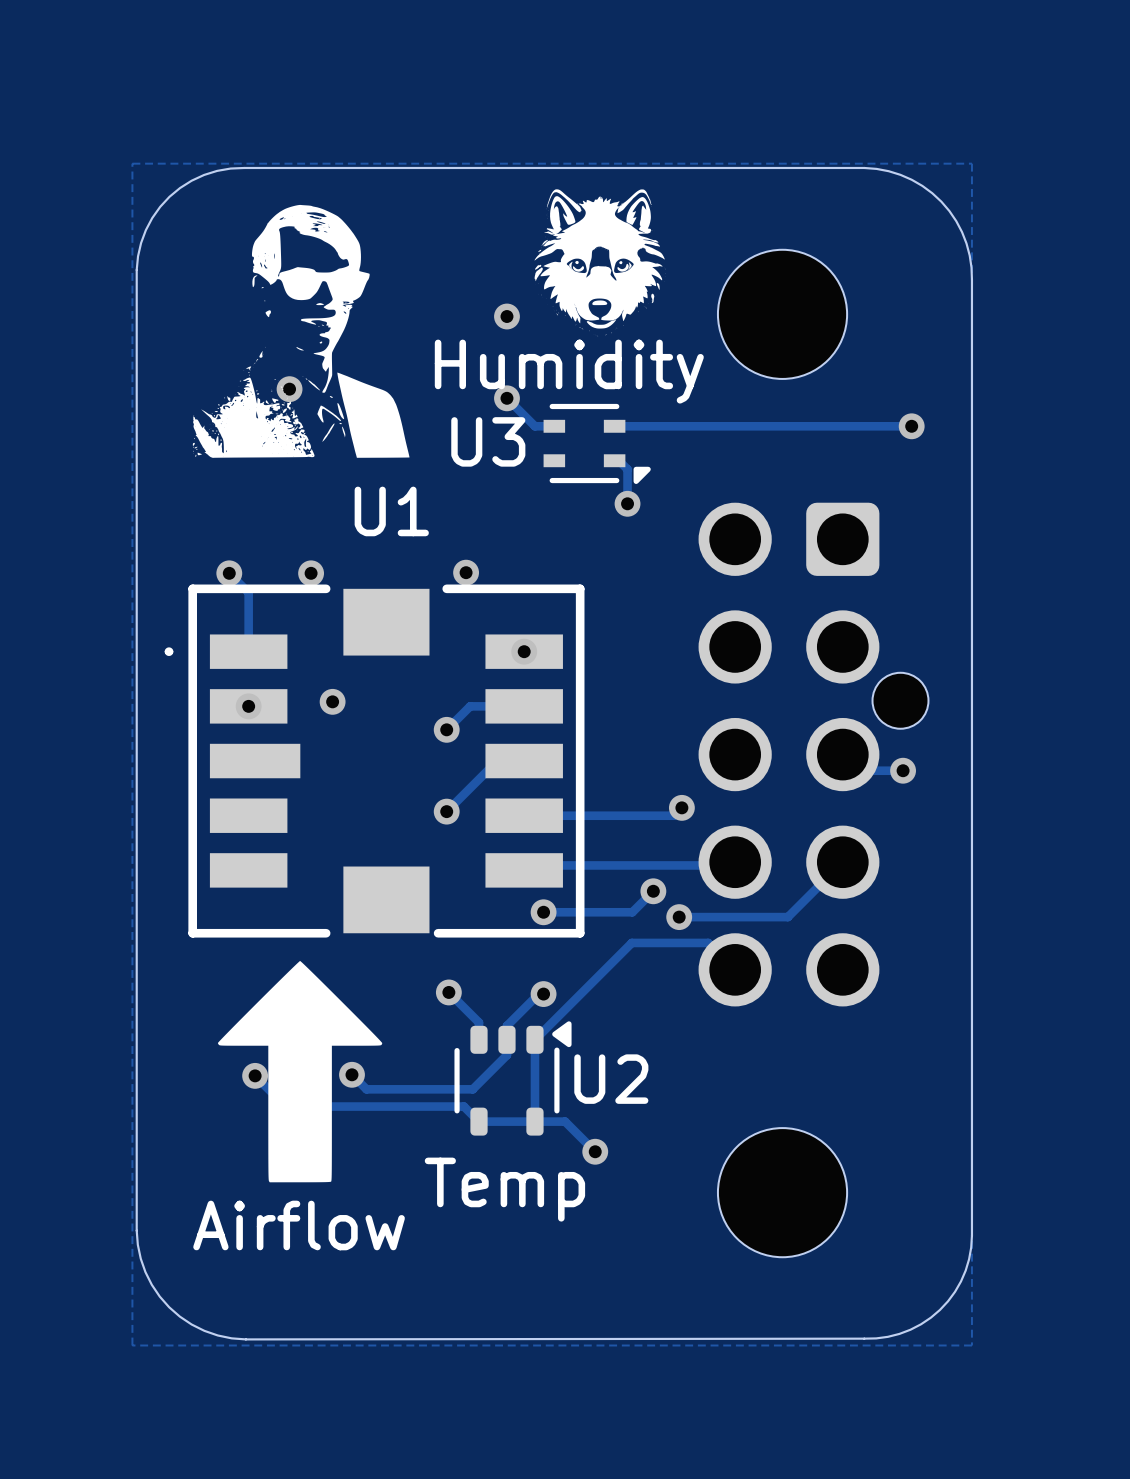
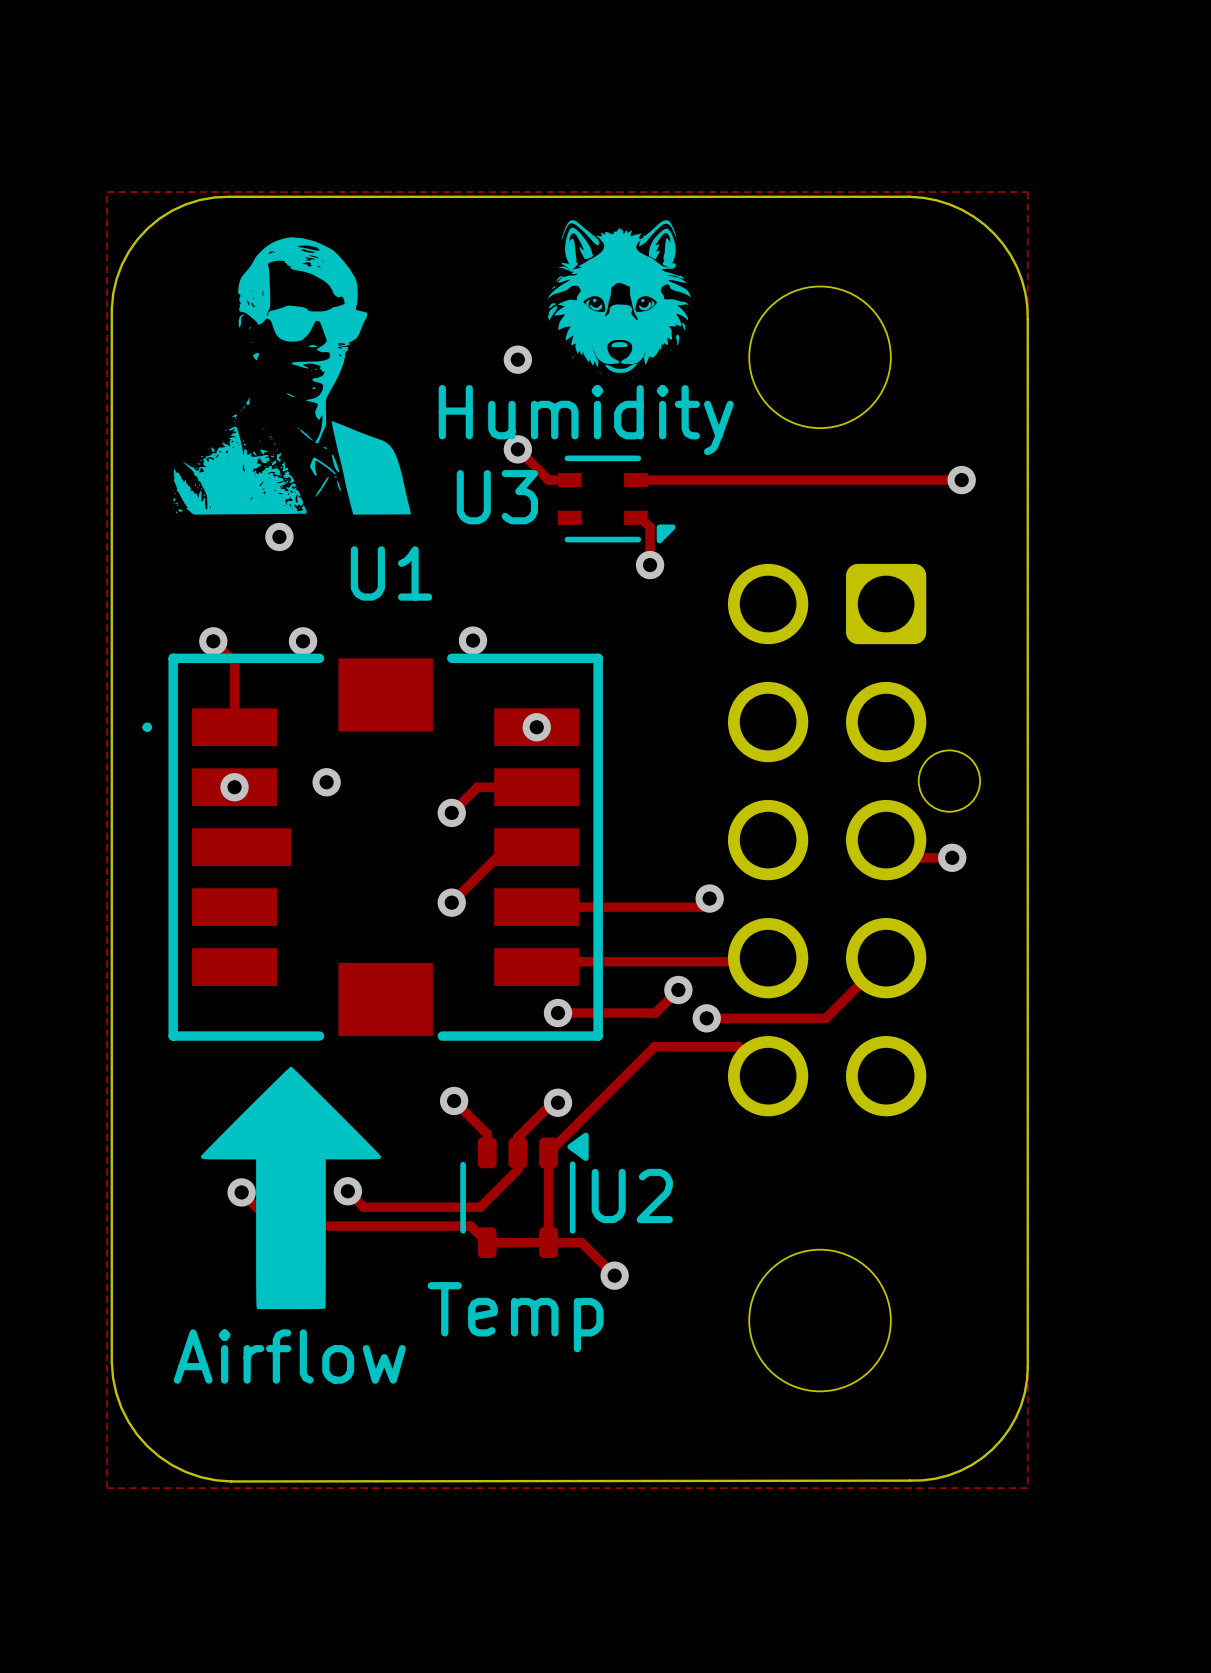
via position: (289, 389) -> (279, 536)

